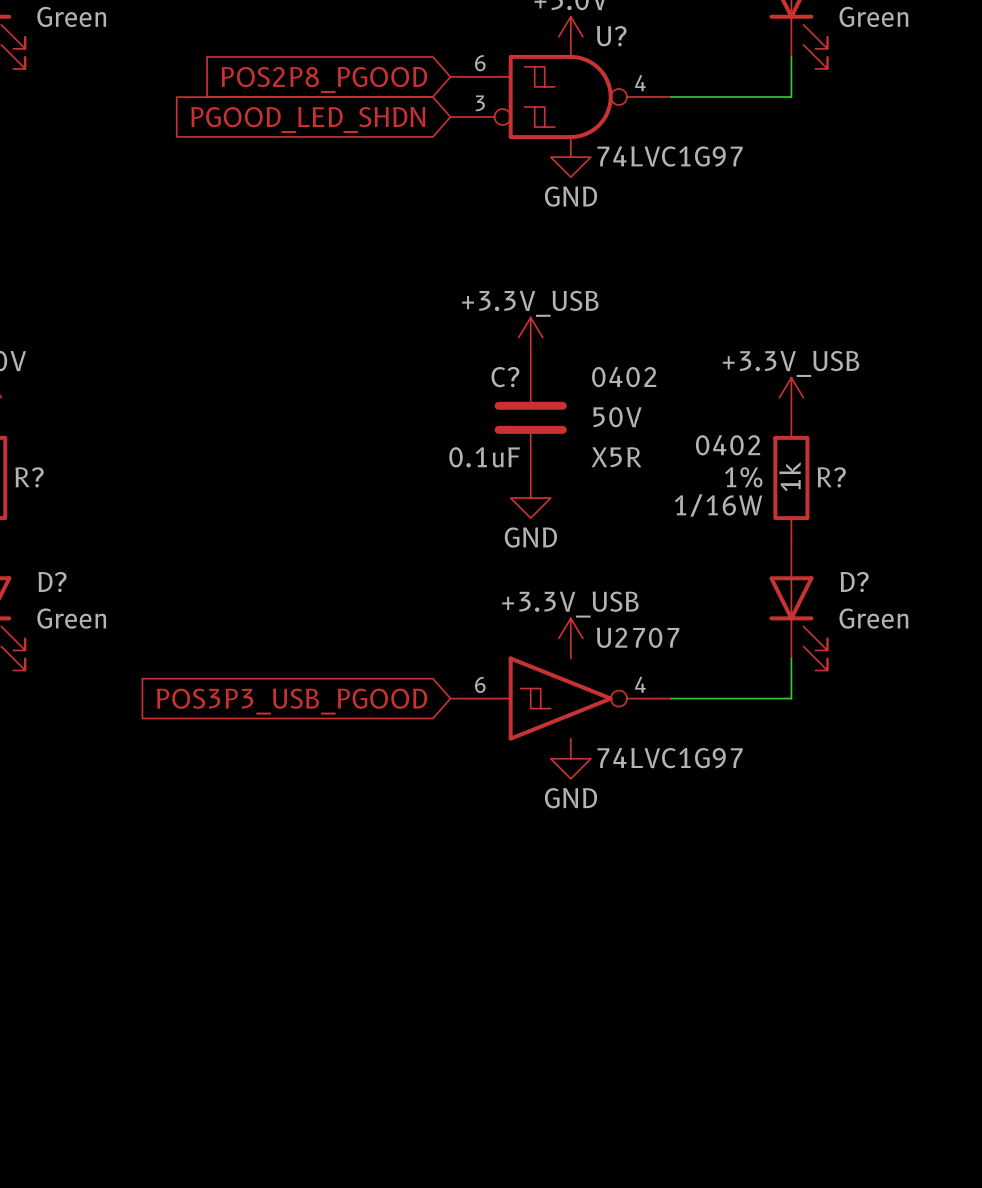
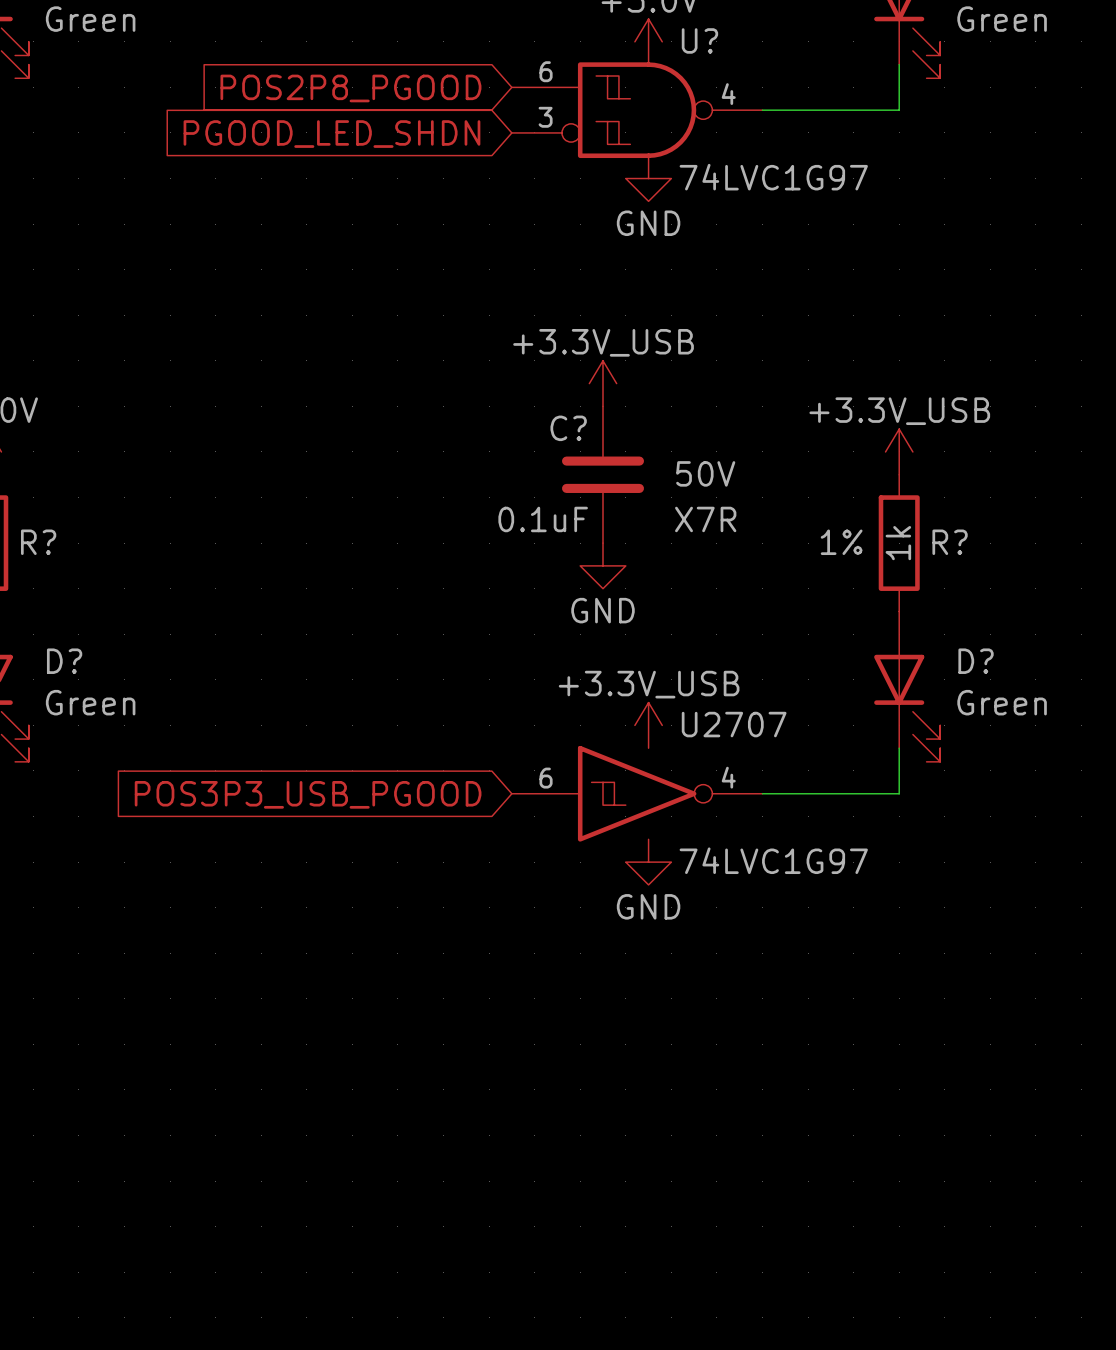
C? text: 0402 (624, 377) -> none
R? text: 0402 (728, 445) -> none
C? text: X5R (616, 457) -> X7R (705, 519)
R? text: 1/16W (718, 505) -> none

